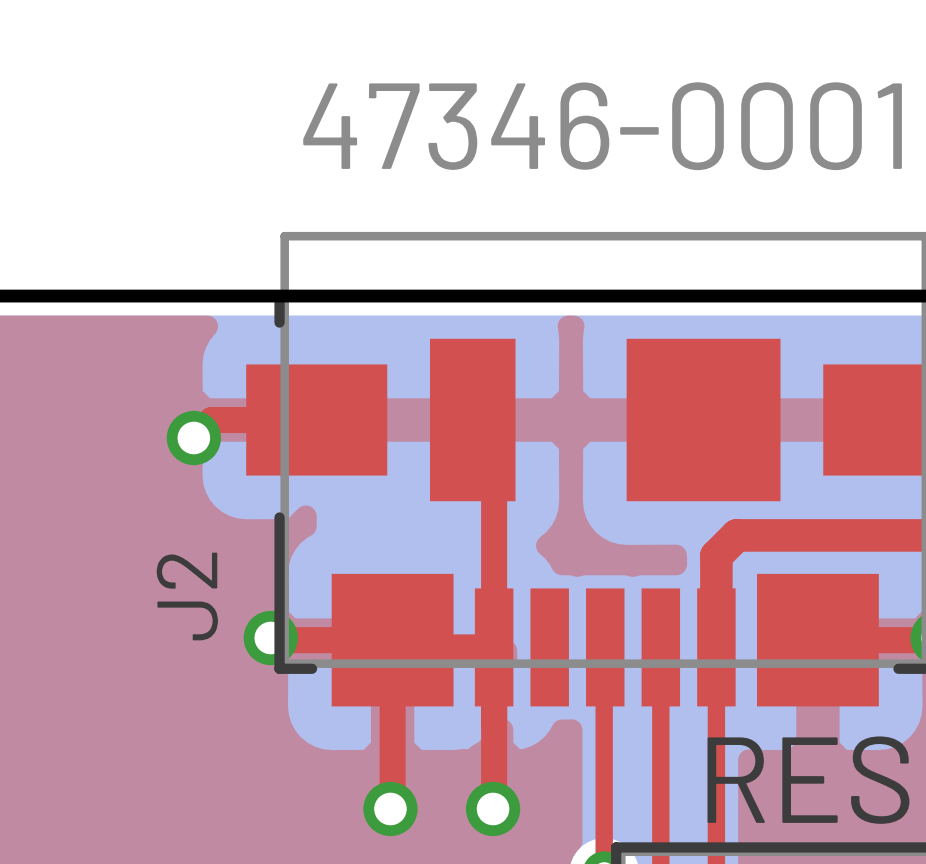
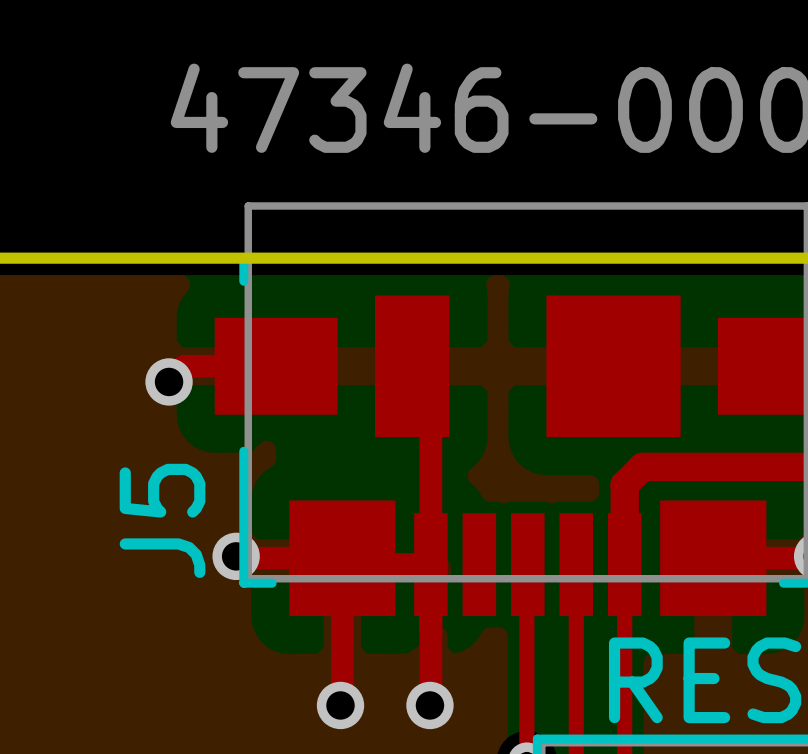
J2 name: J2 (187, 596) -> J5 (162, 520)

